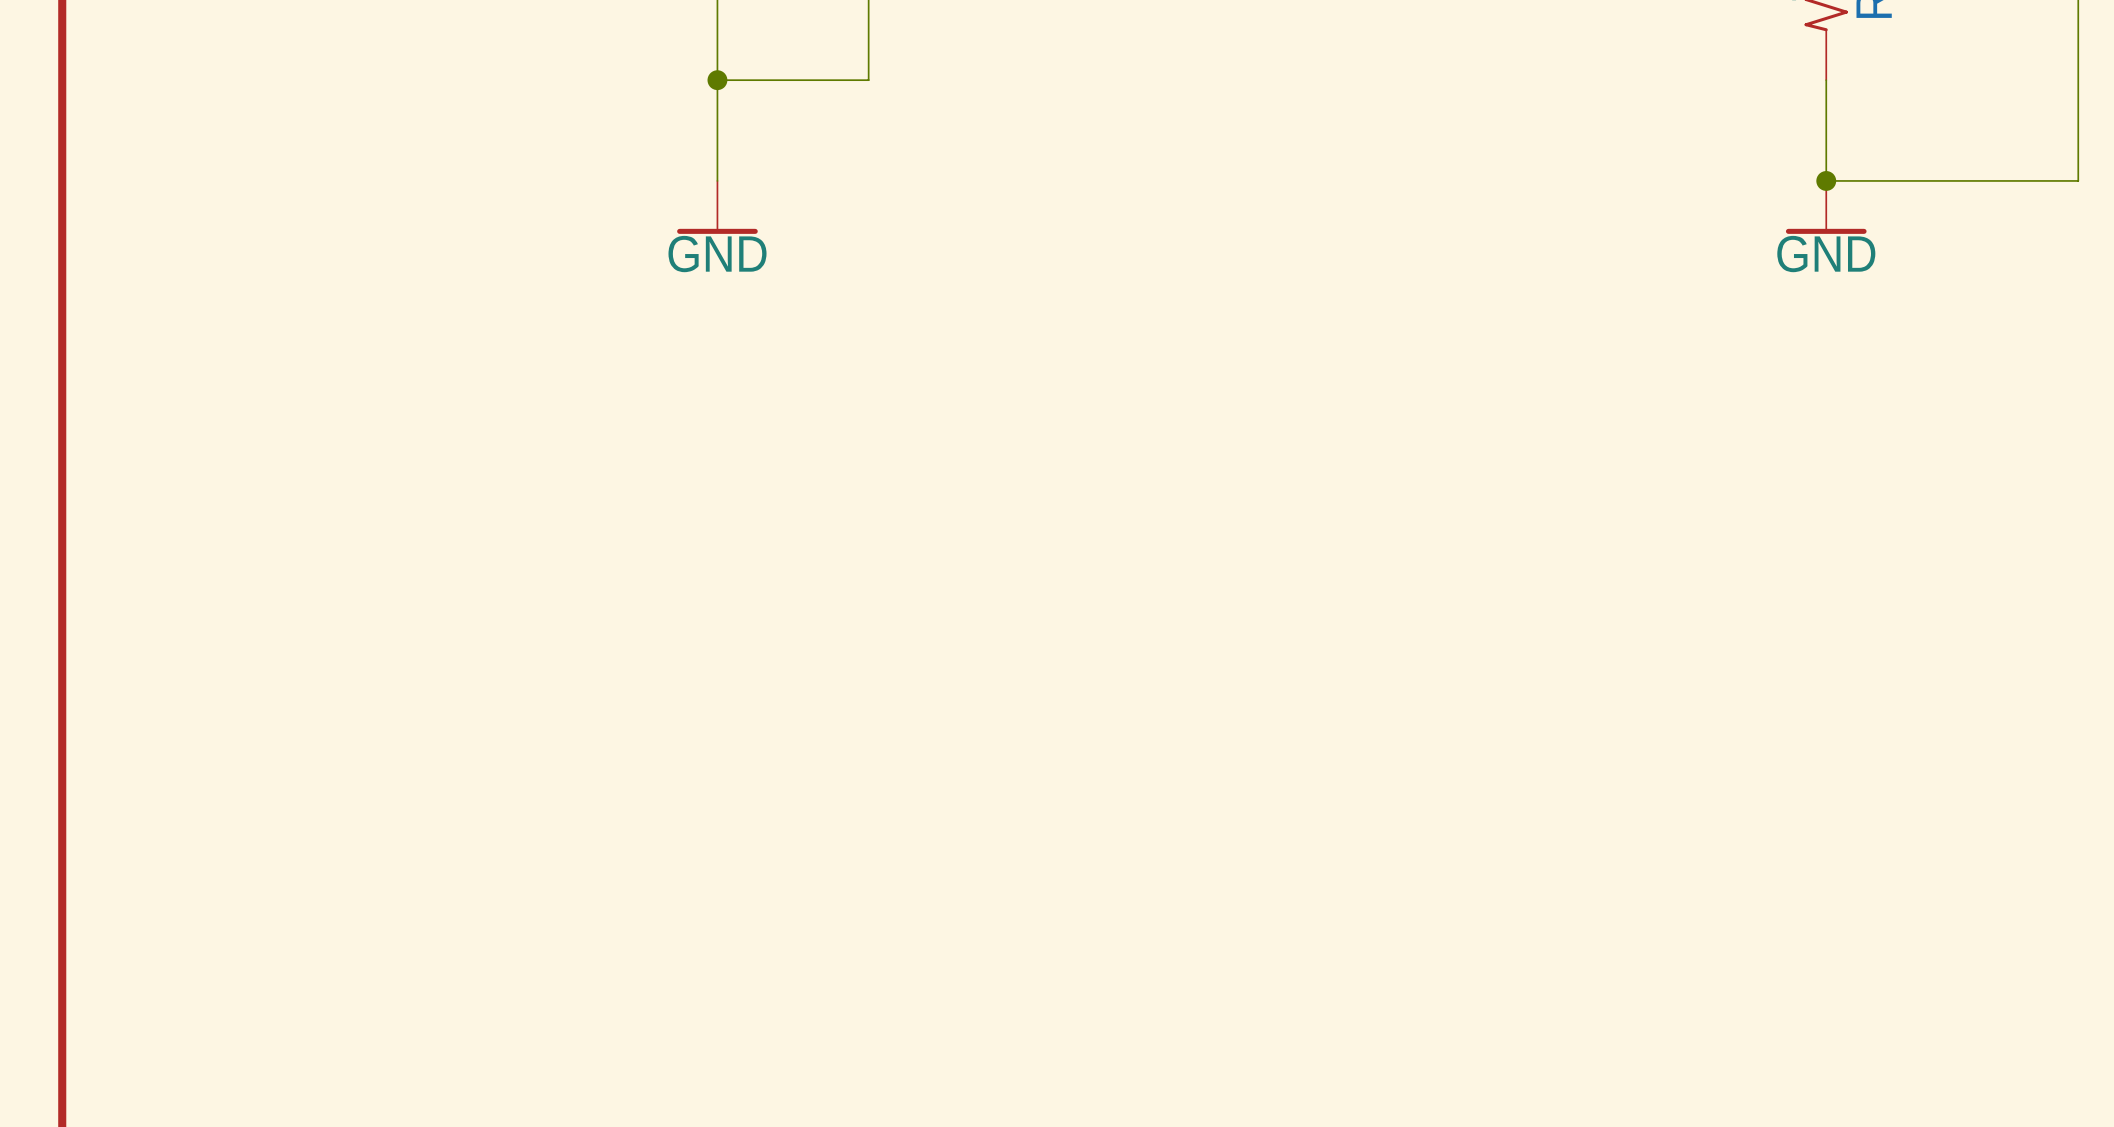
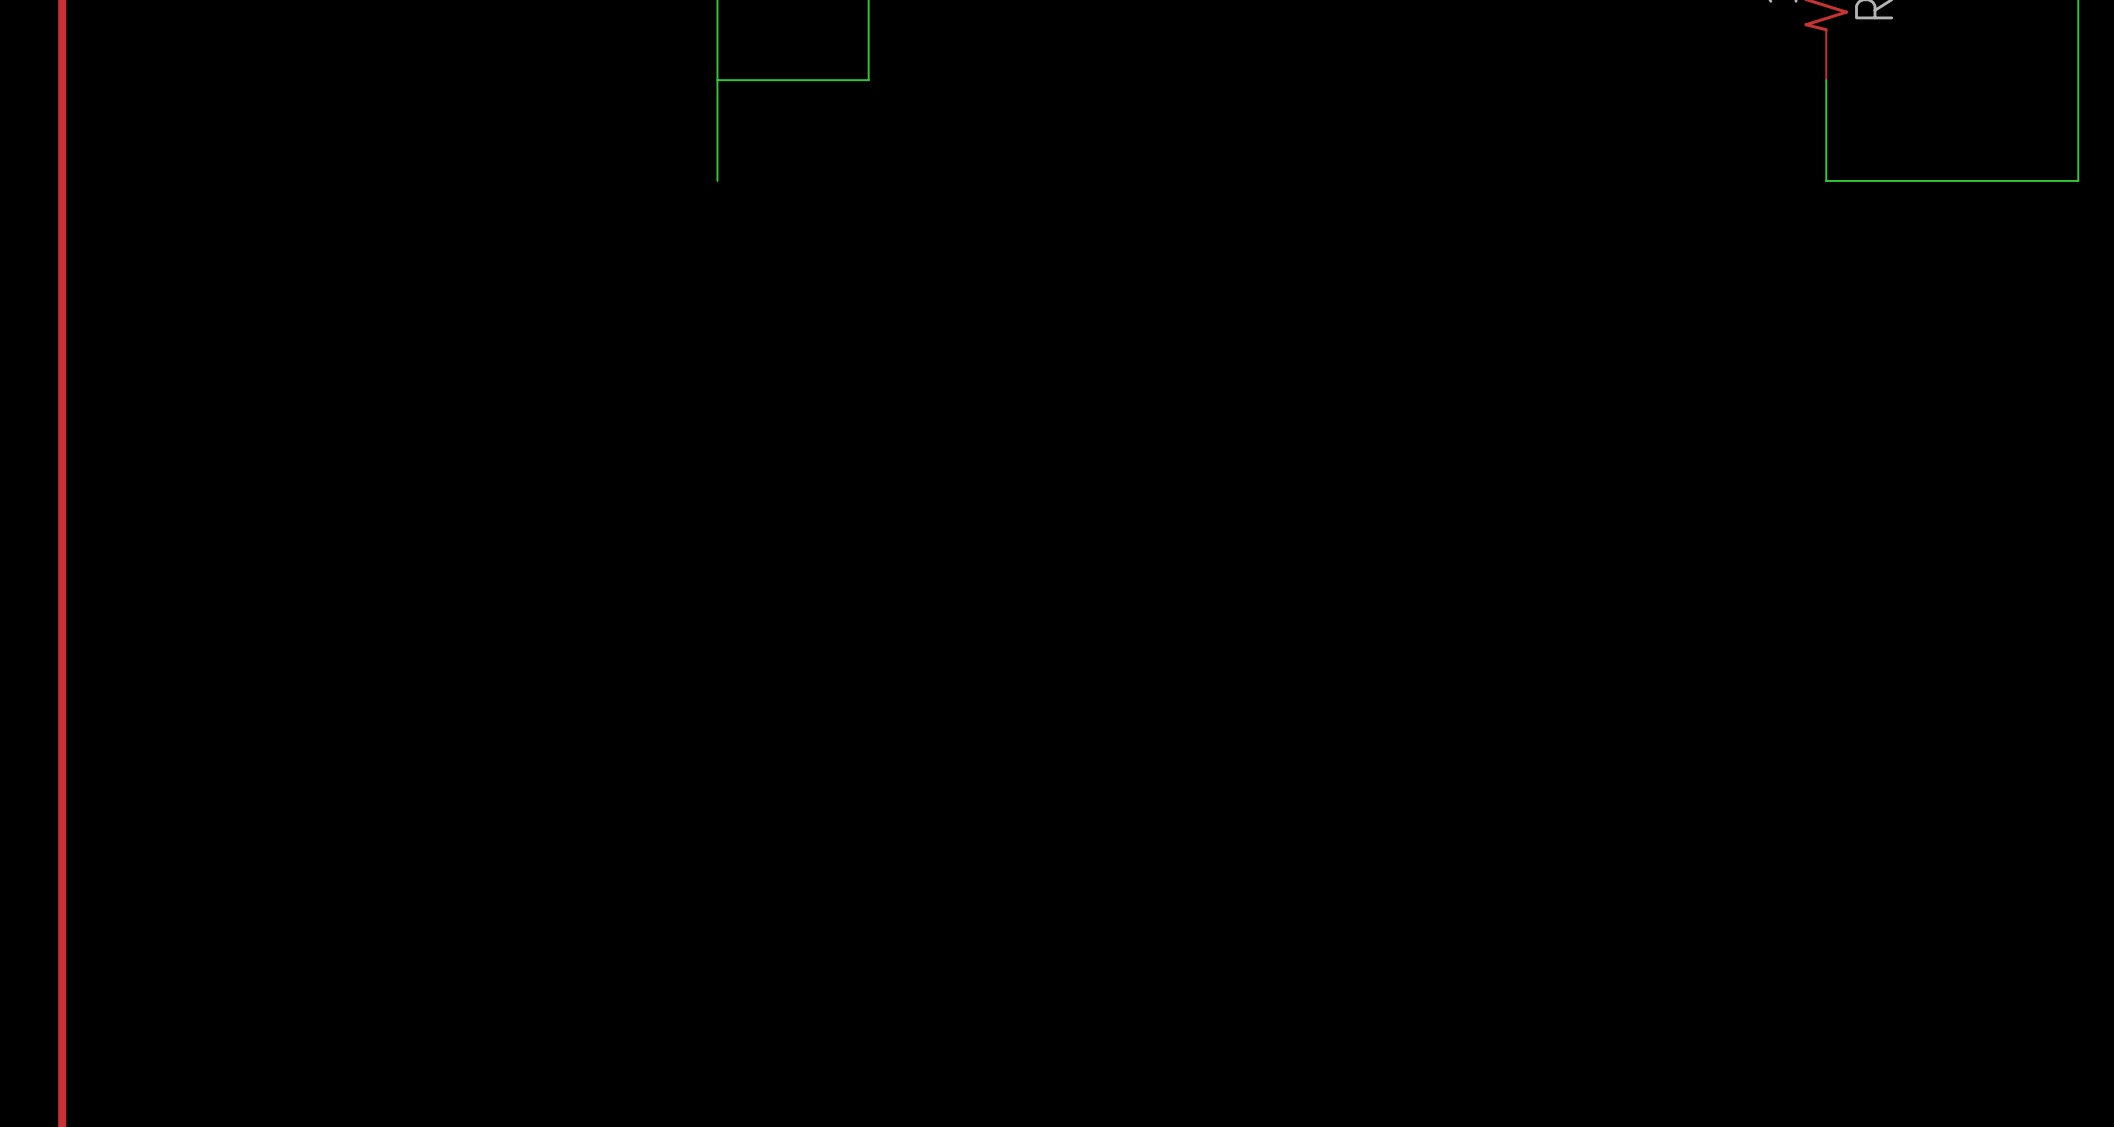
junction: (717, 80) -> none
junction: (1826, 180) -> none
power symbol: GND (717, 207) -> none
power symbol: GND (1826, 207) -> none

